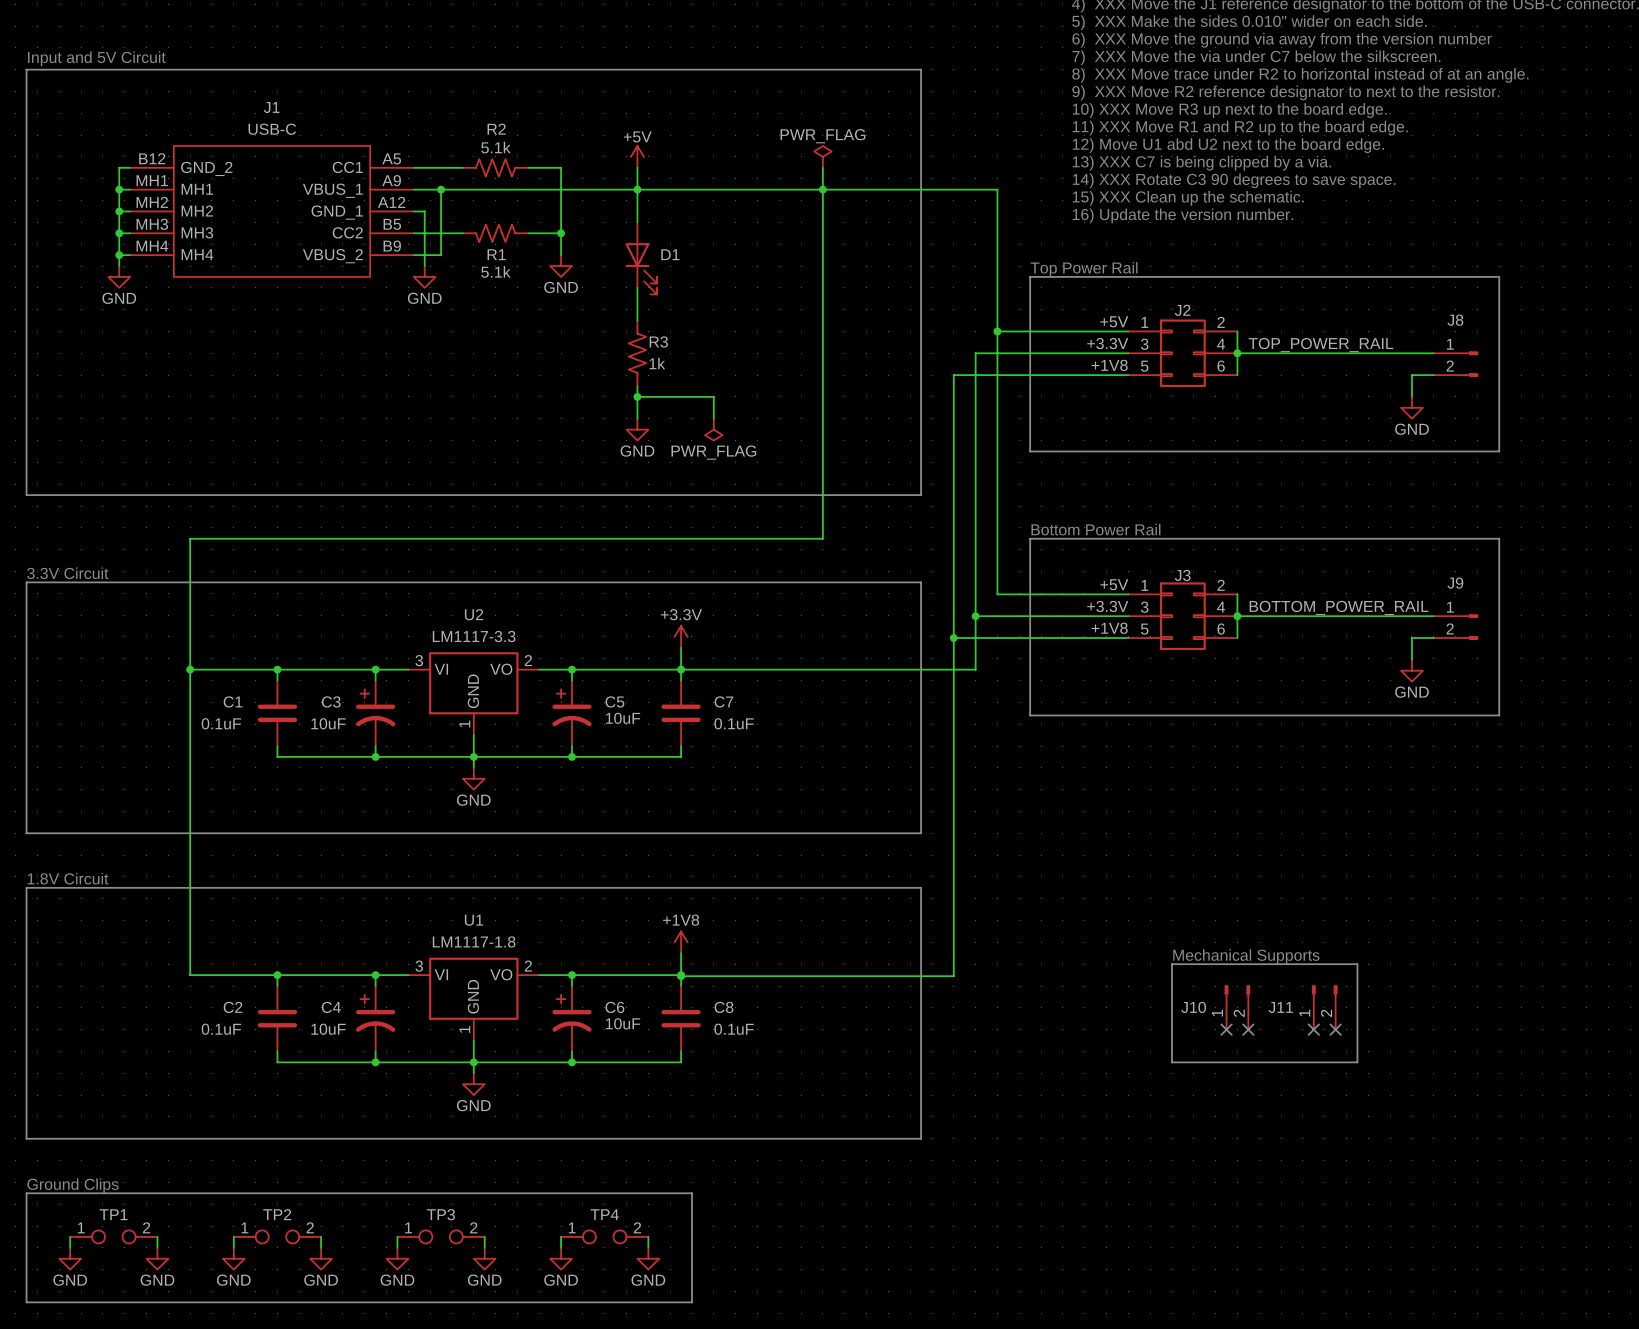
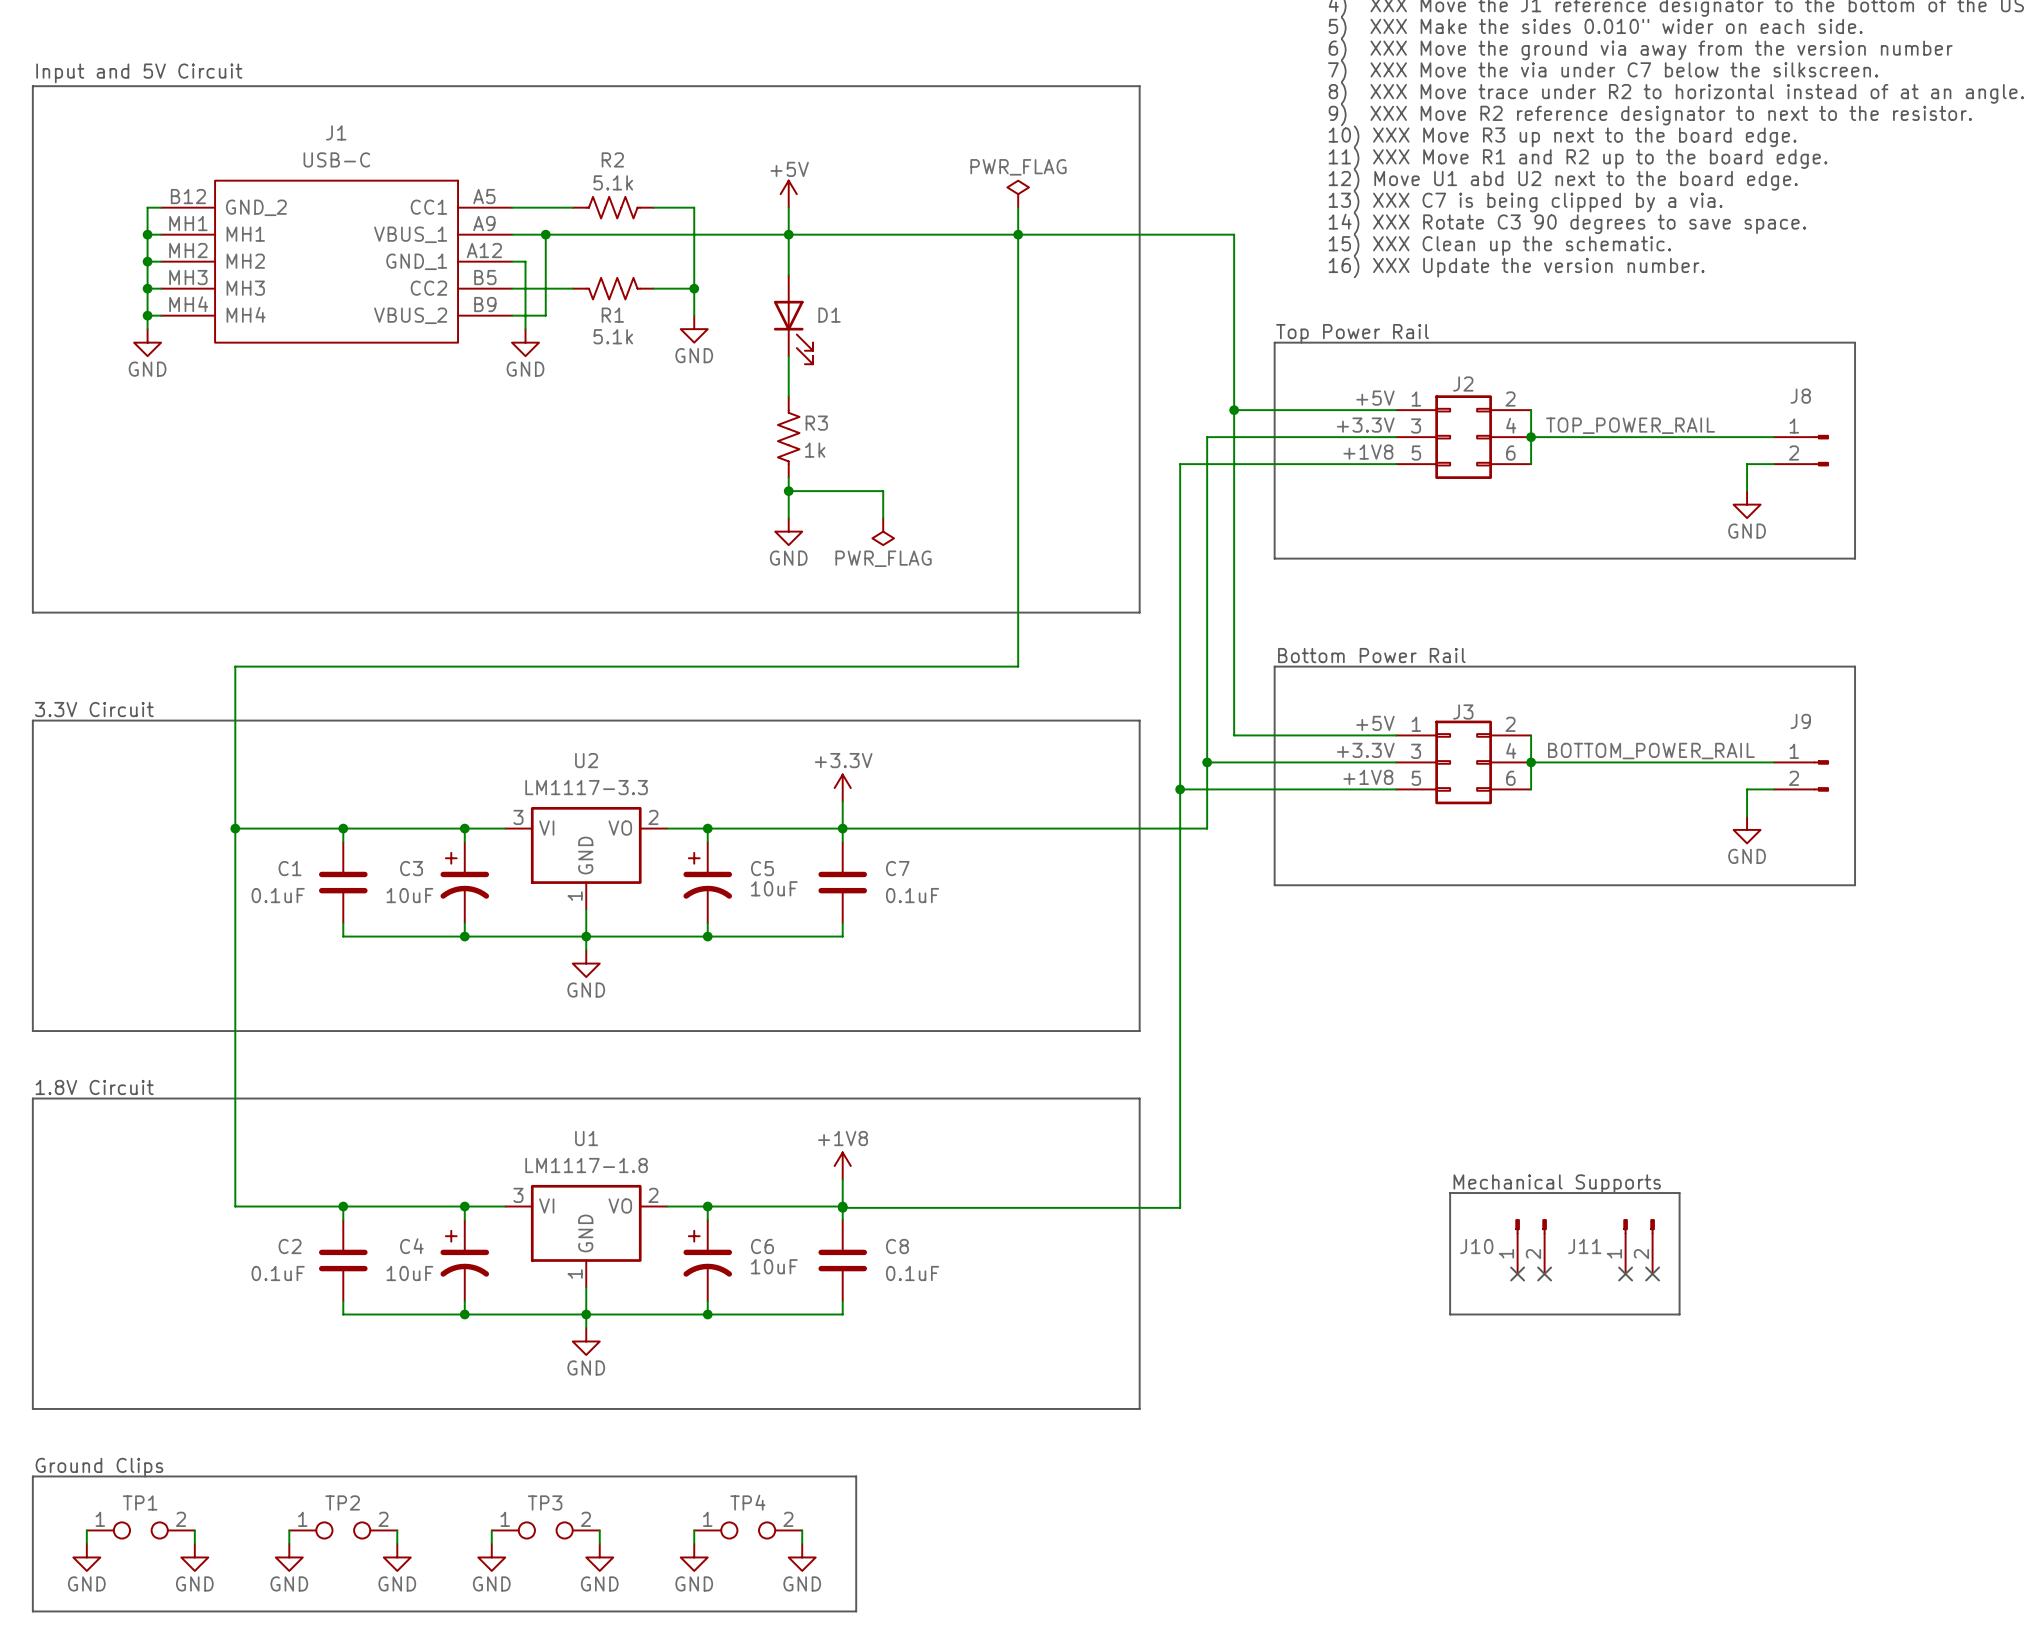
text: 16) Update the version number. (1183, 215) -> 16) XXX Update the version number. (1516, 267)

